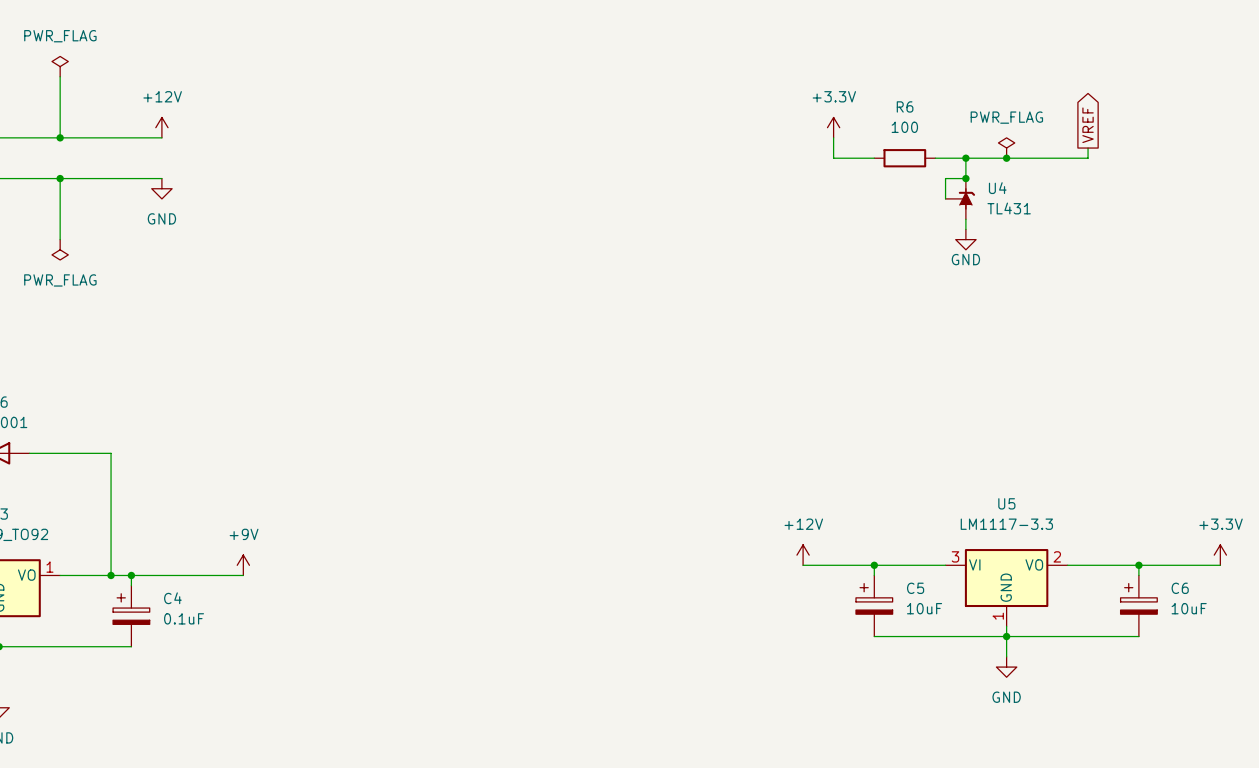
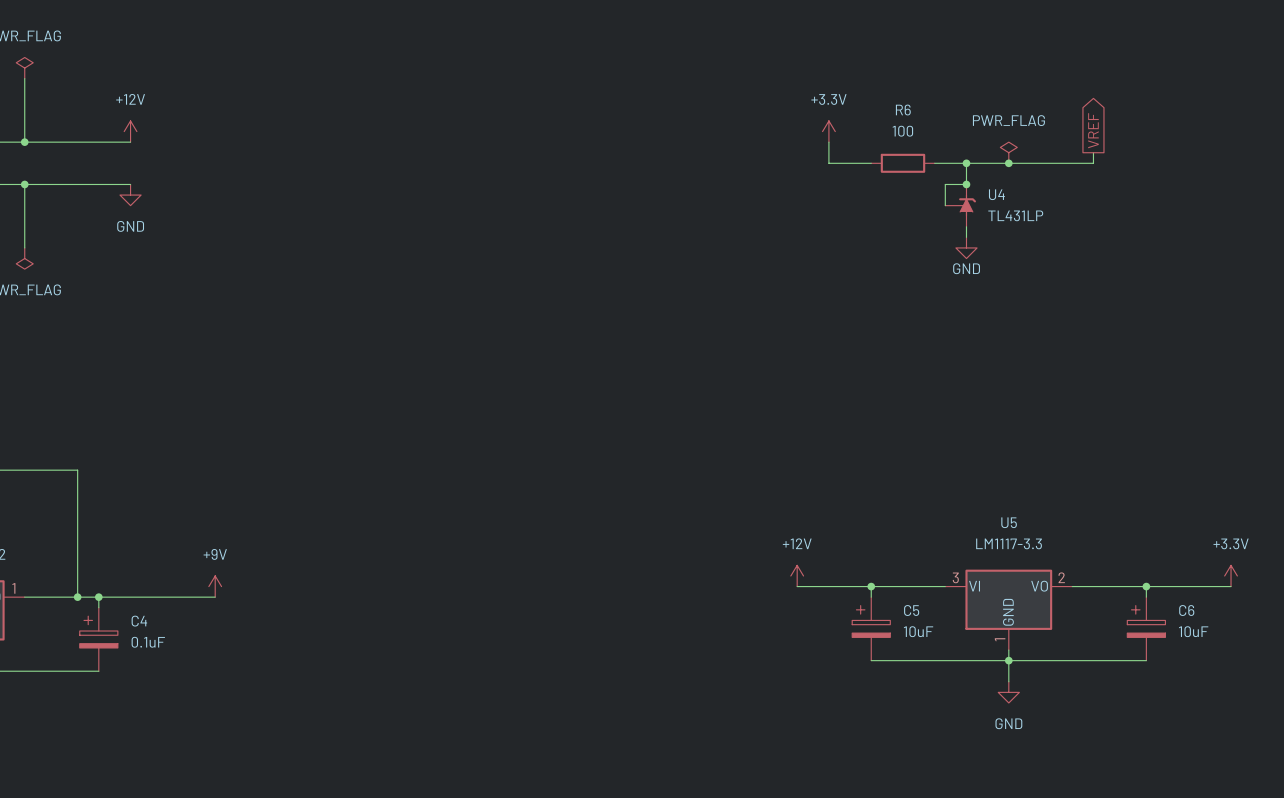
U4 value: TL431 (1009, 208) -> TL431LP (1015, 215)

